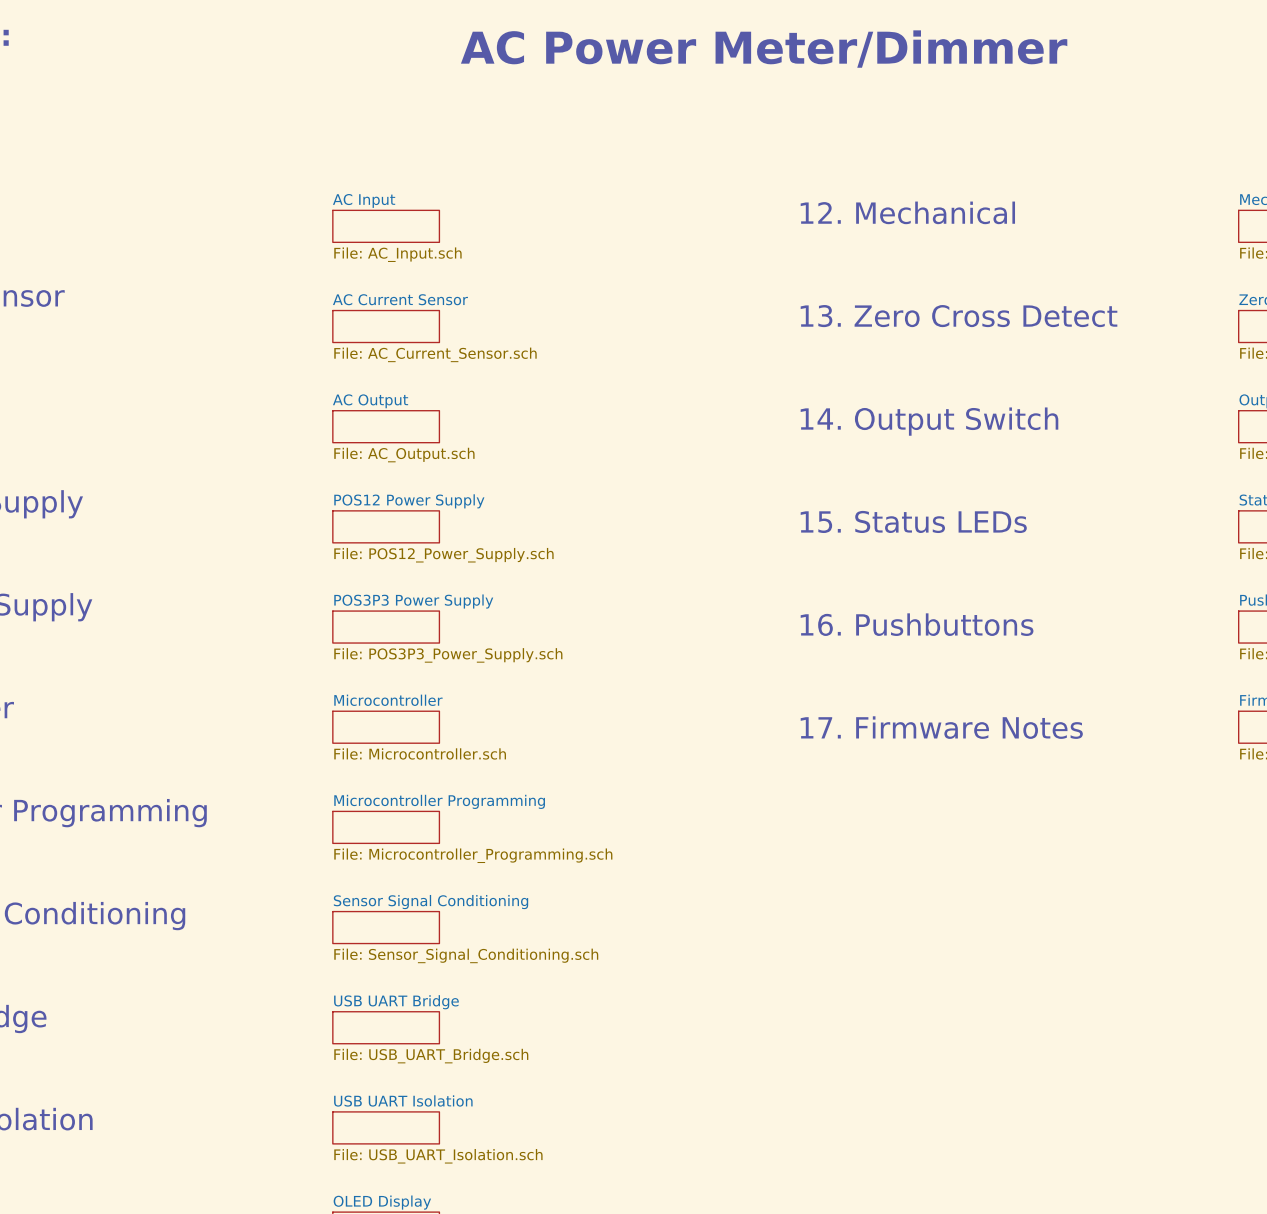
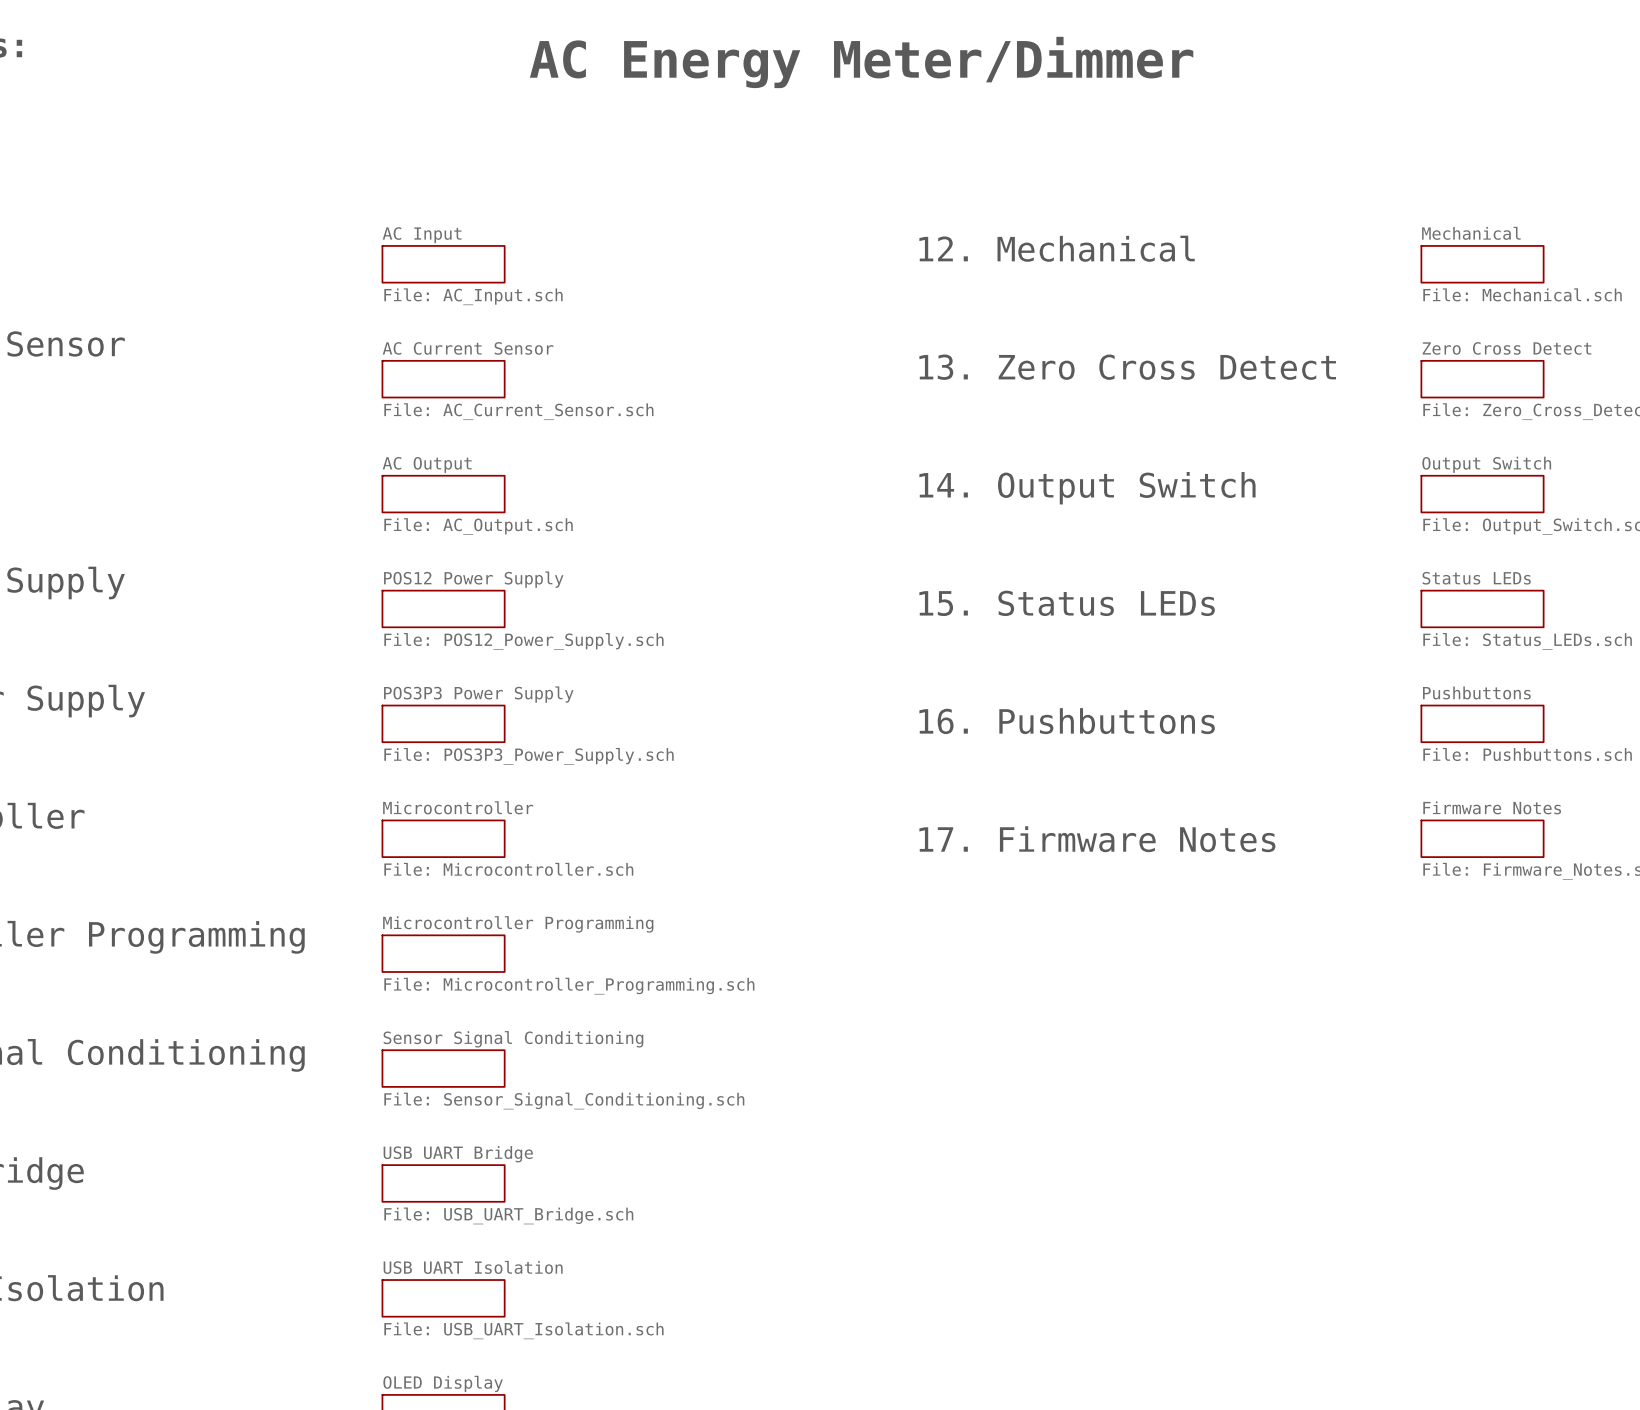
text: AC Power Meter/Dimmer (764, 49) -> AC Energy Meter/Dimmer (861, 62)

